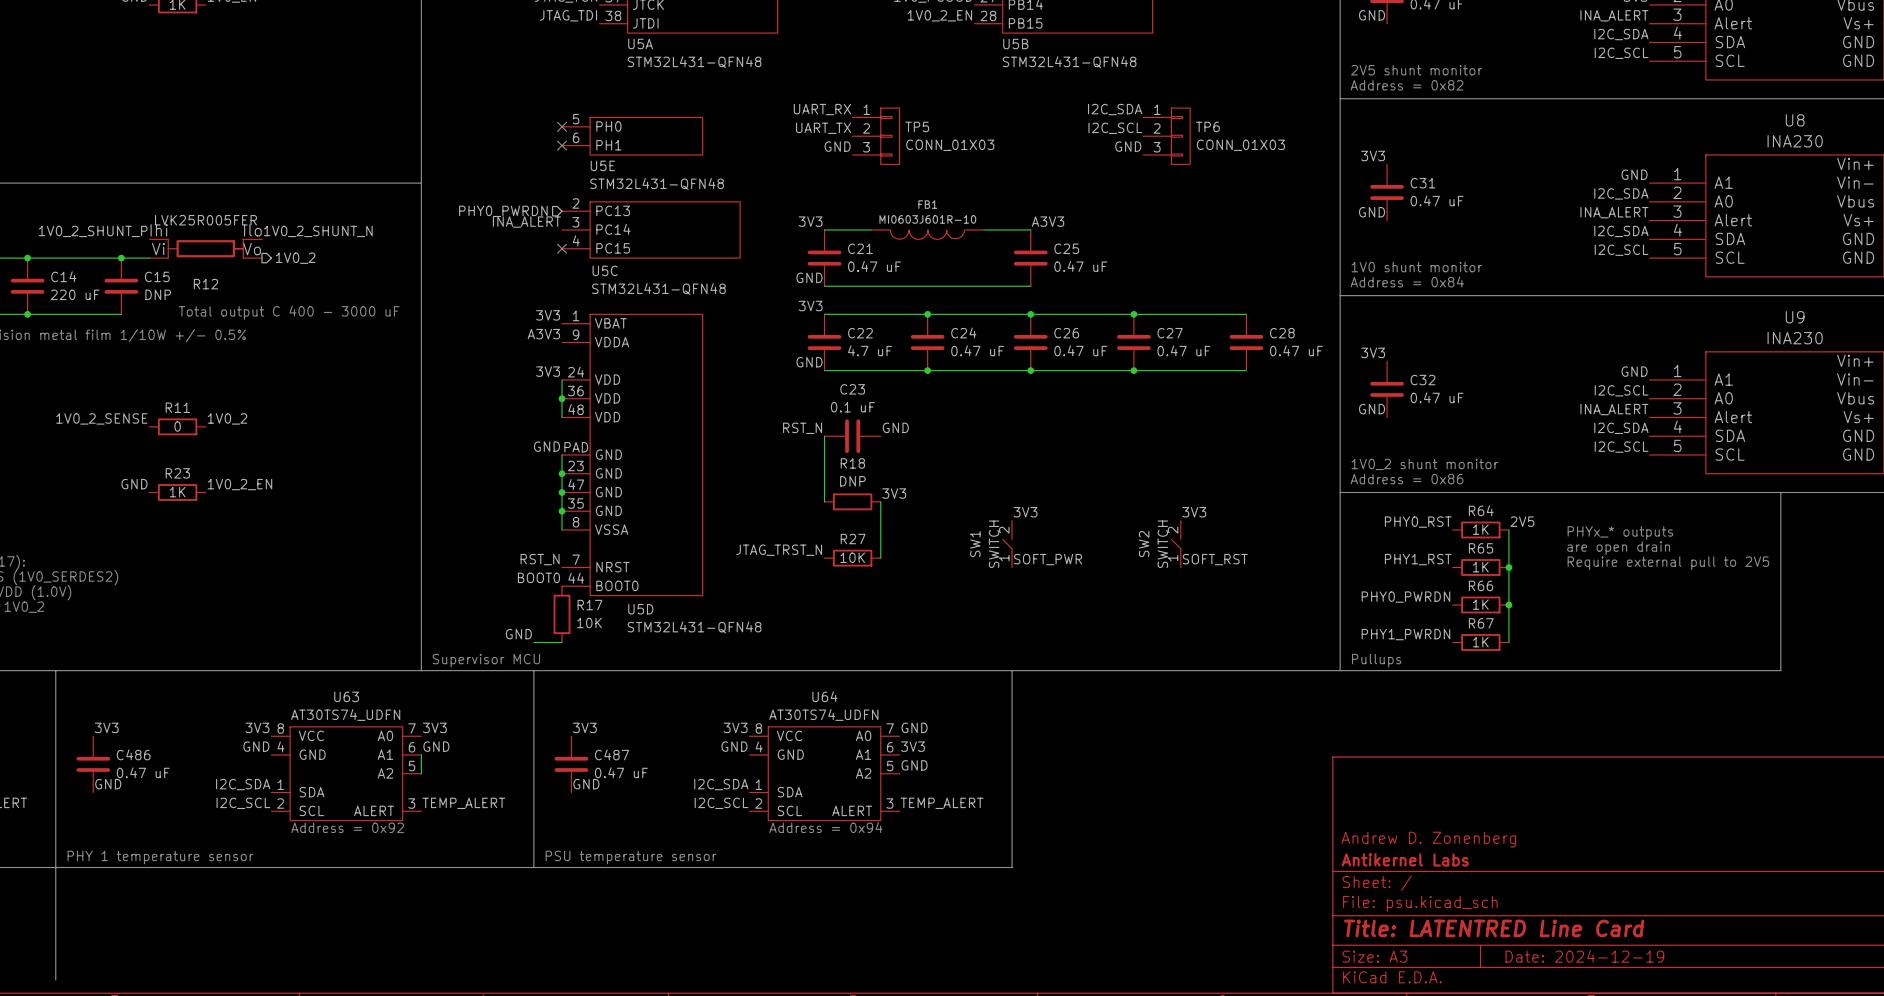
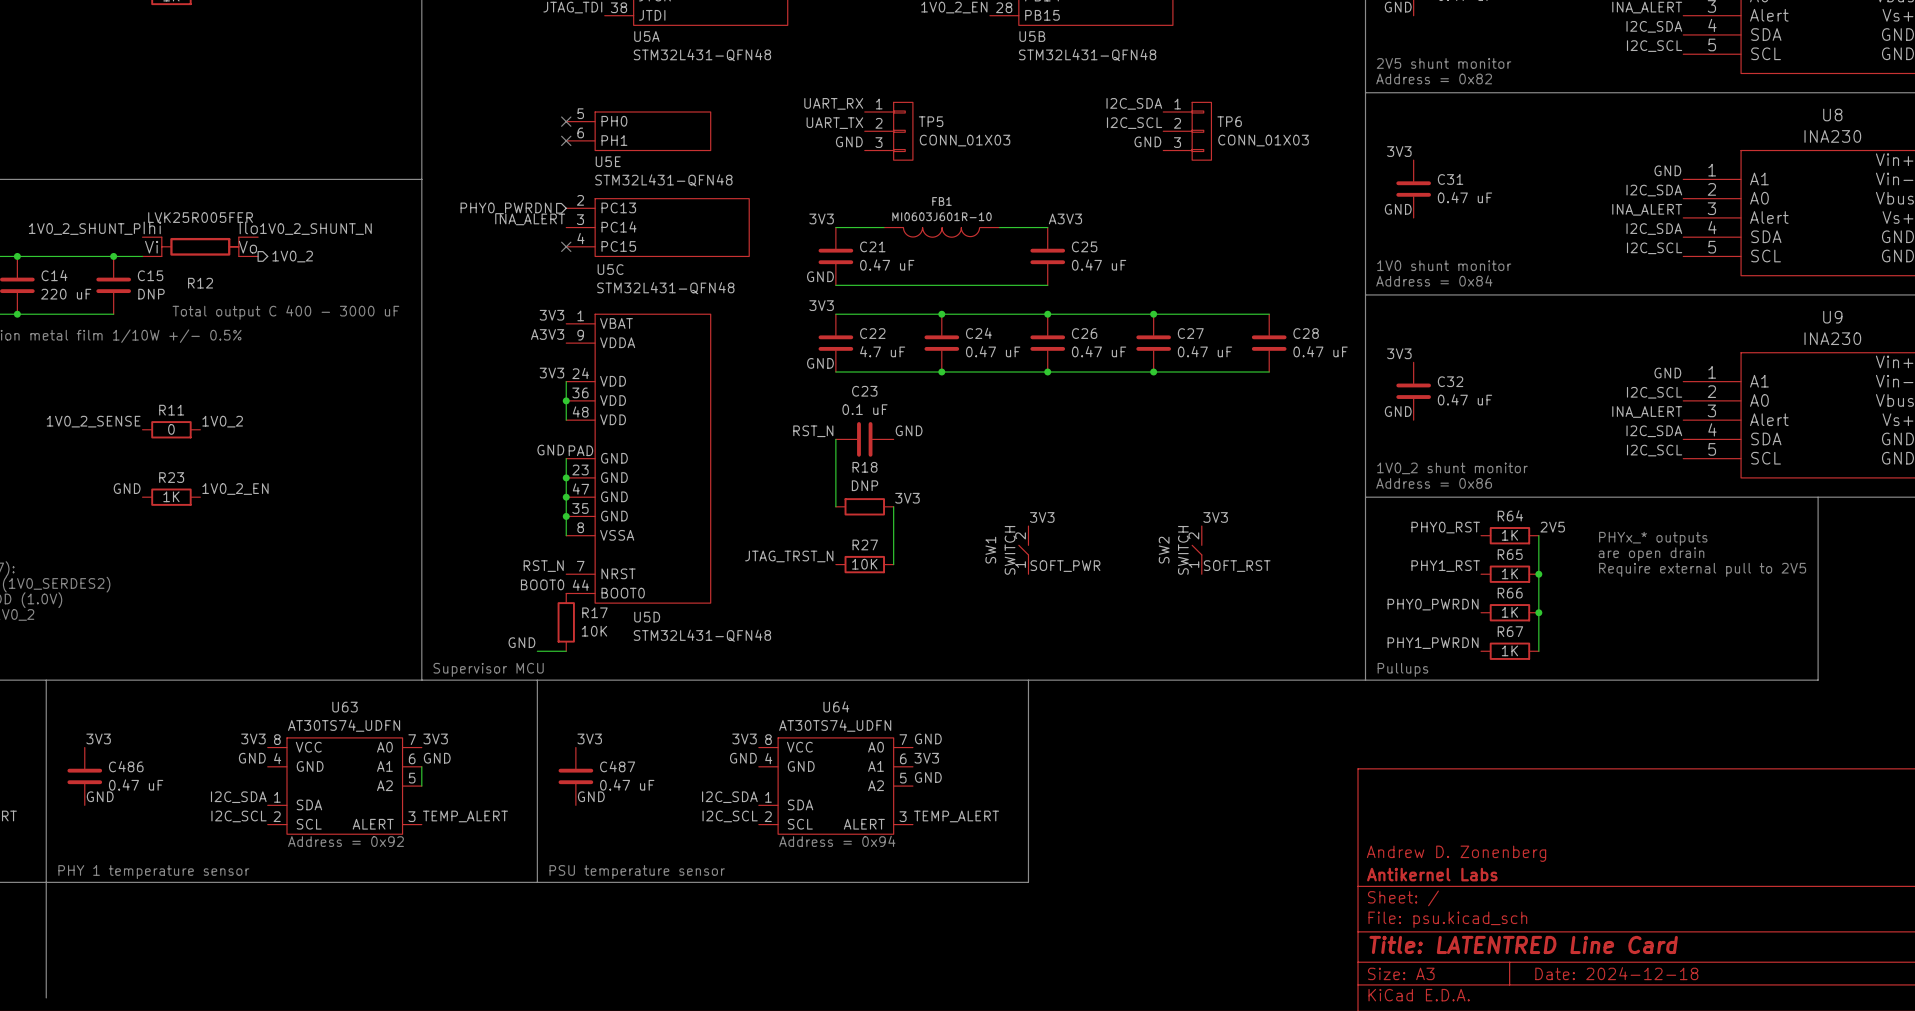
title block: Date: 2024-12-19 (1584, 956) -> Date: 2024-12-18 (1616, 973)

